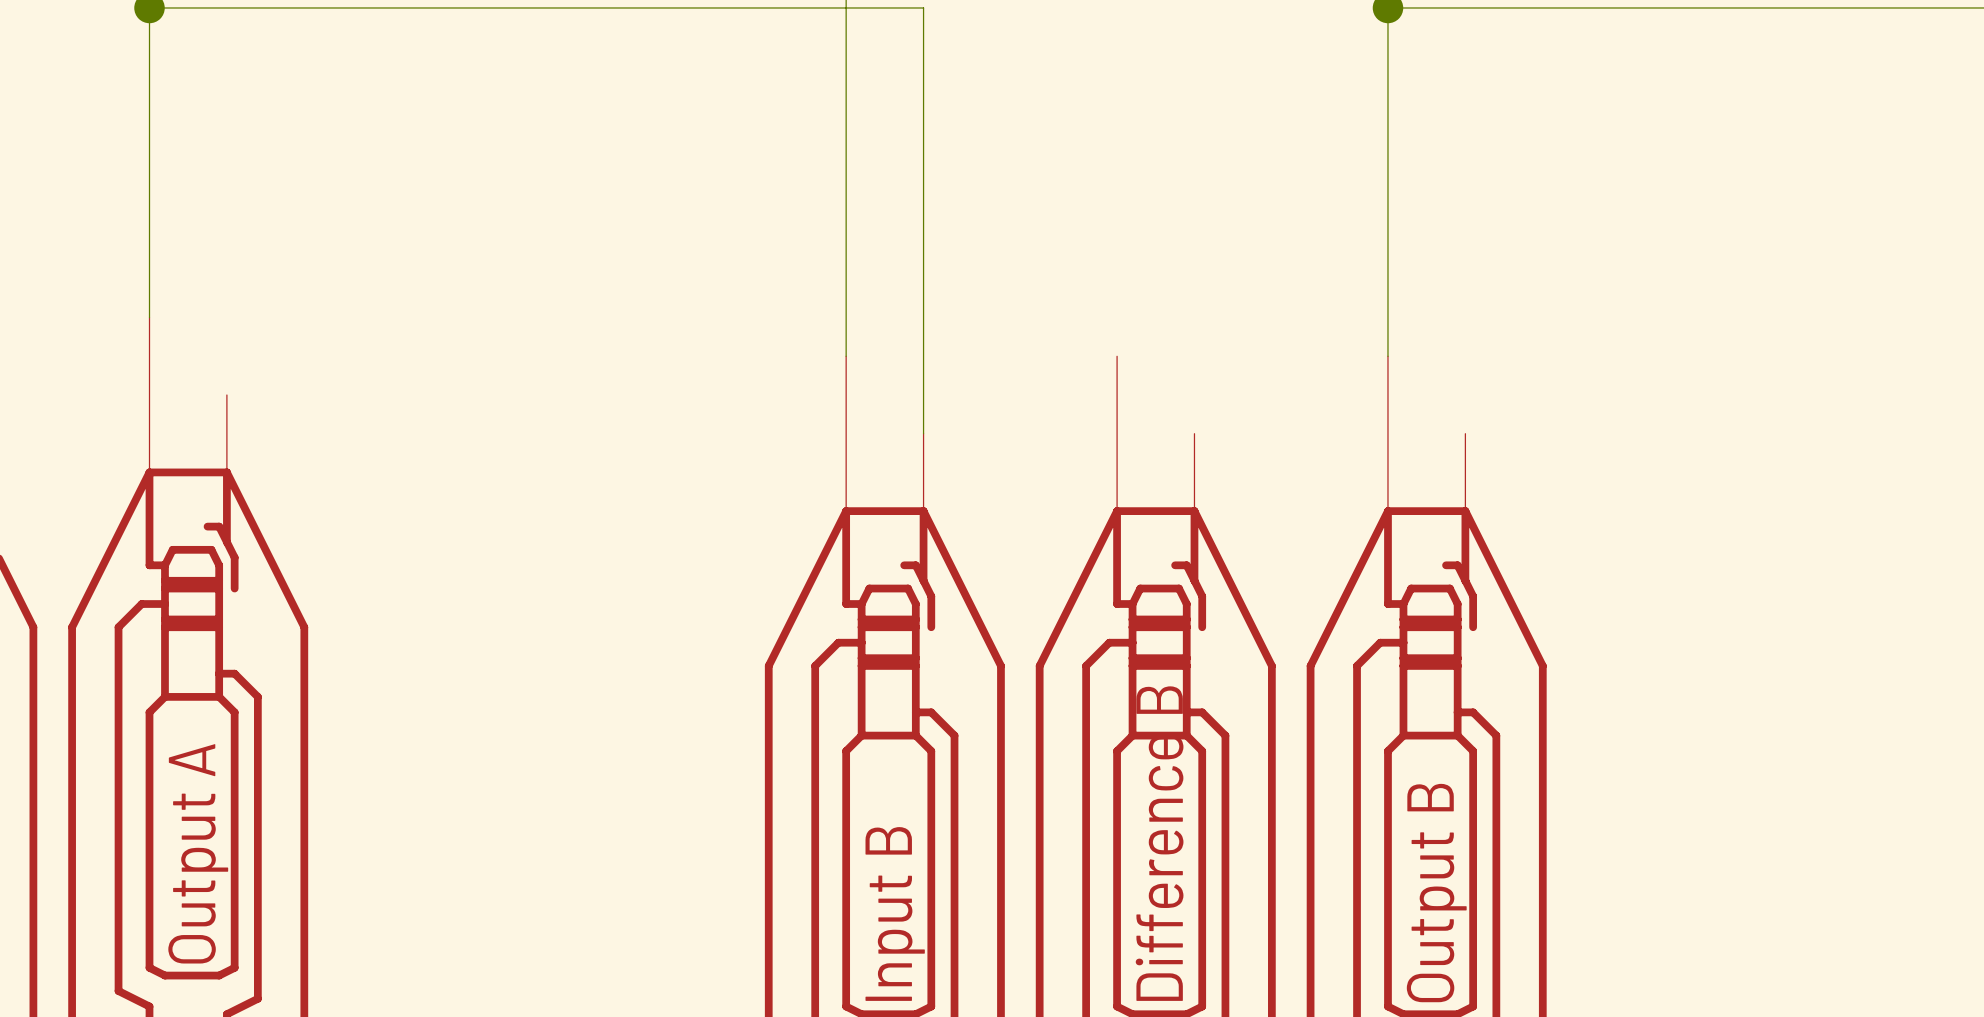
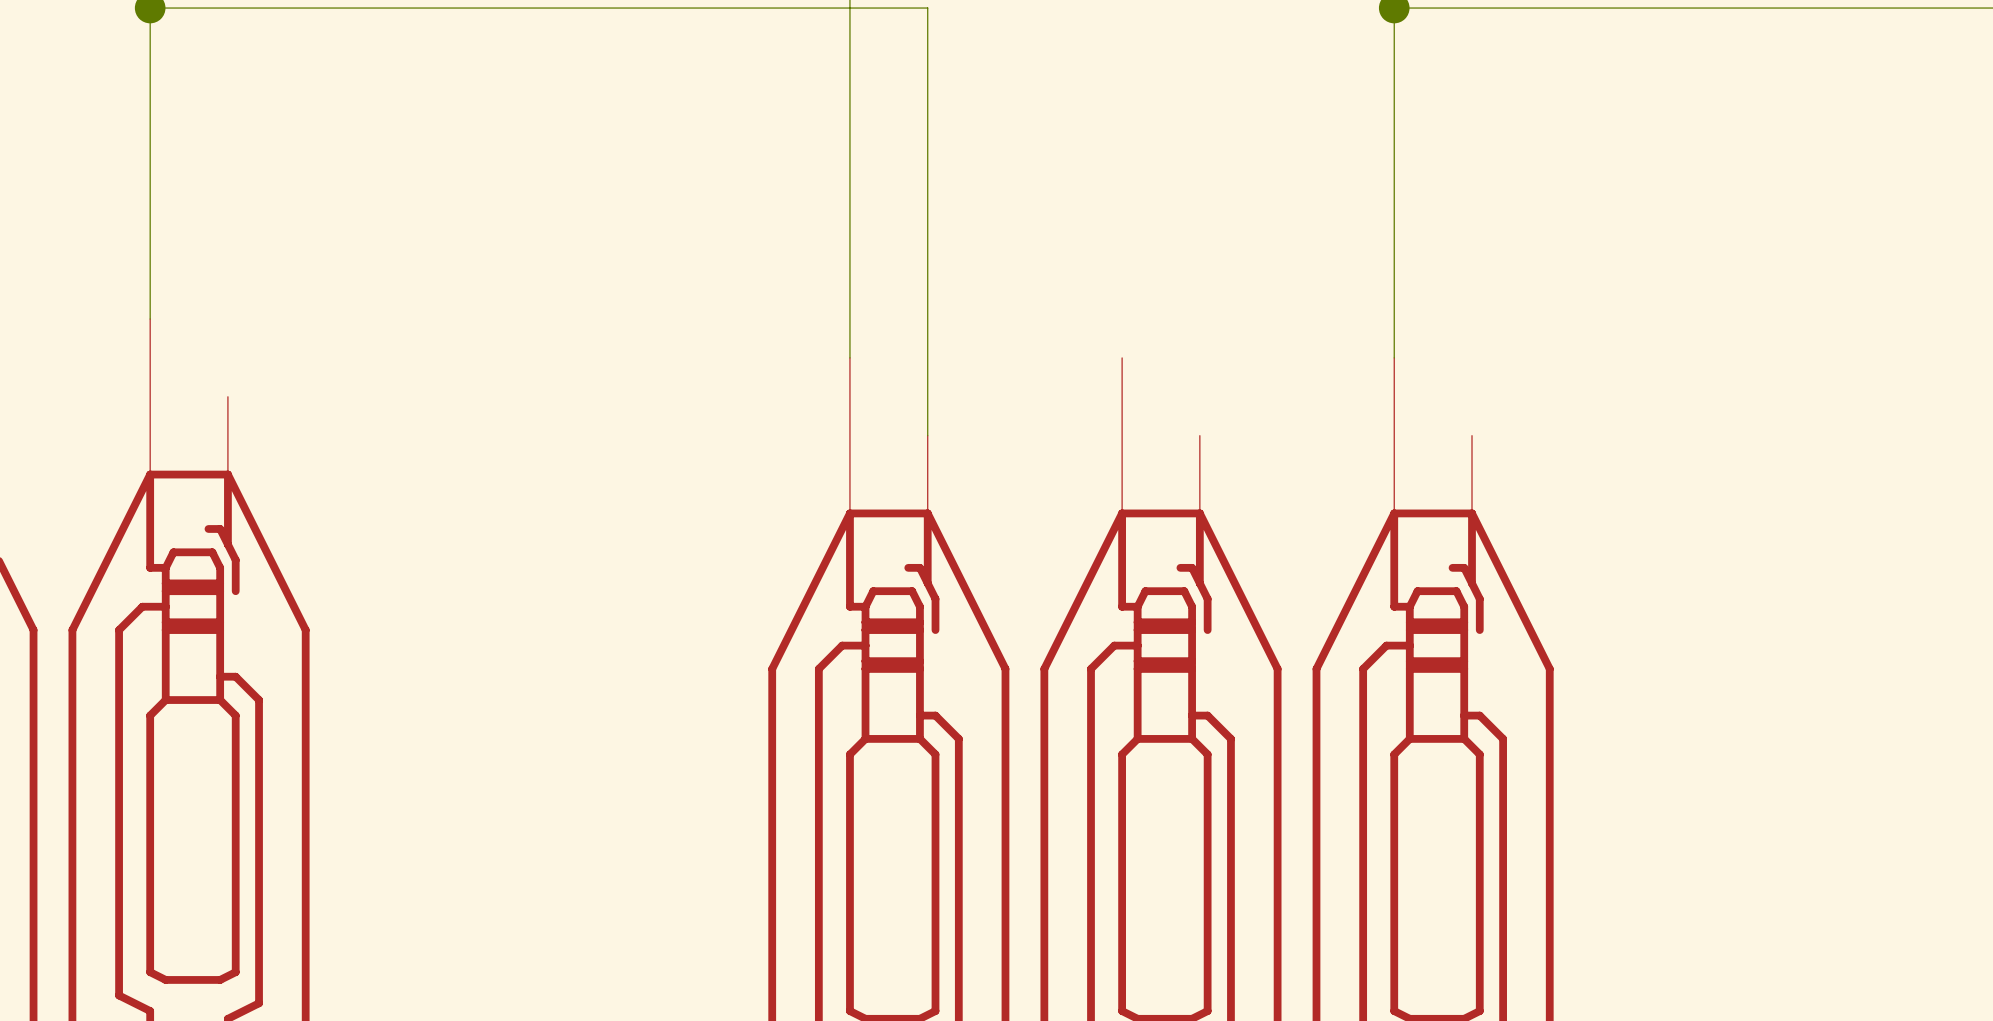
part text: Difference B (1159, 843) -> none
part text: Output A (198, 853) -> none
part text: Output B (1436, 893) -> none
part text: Input B (895, 913) -> none

